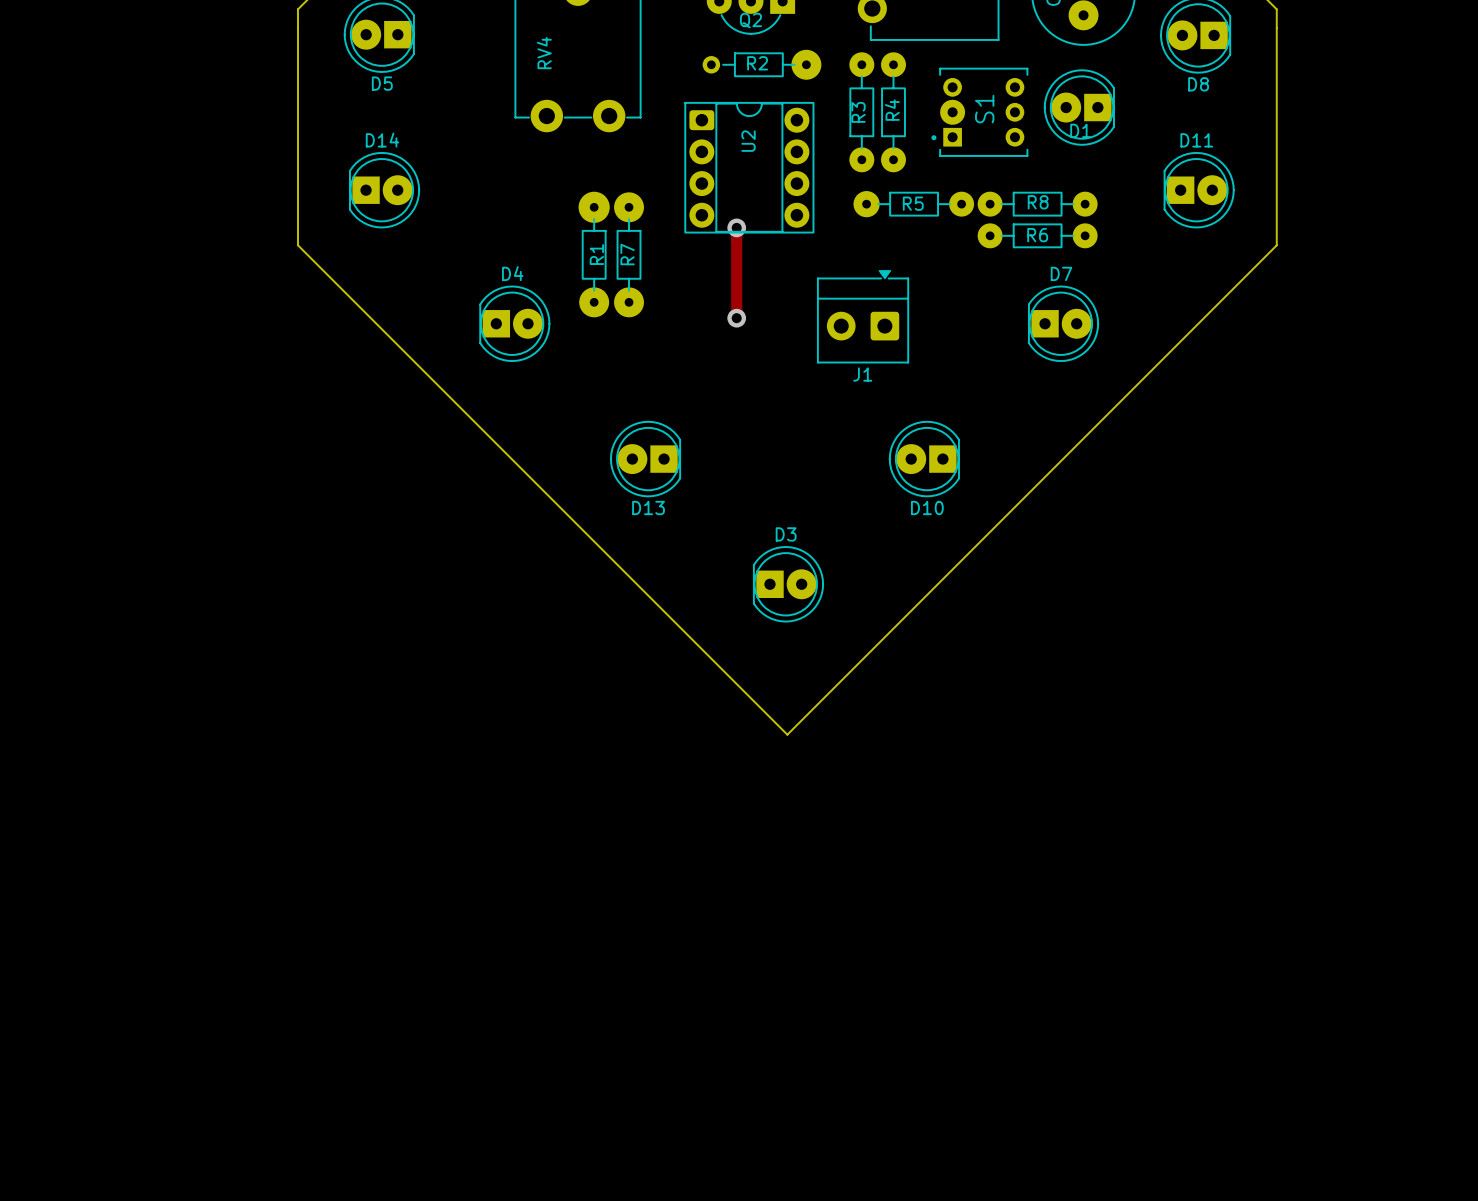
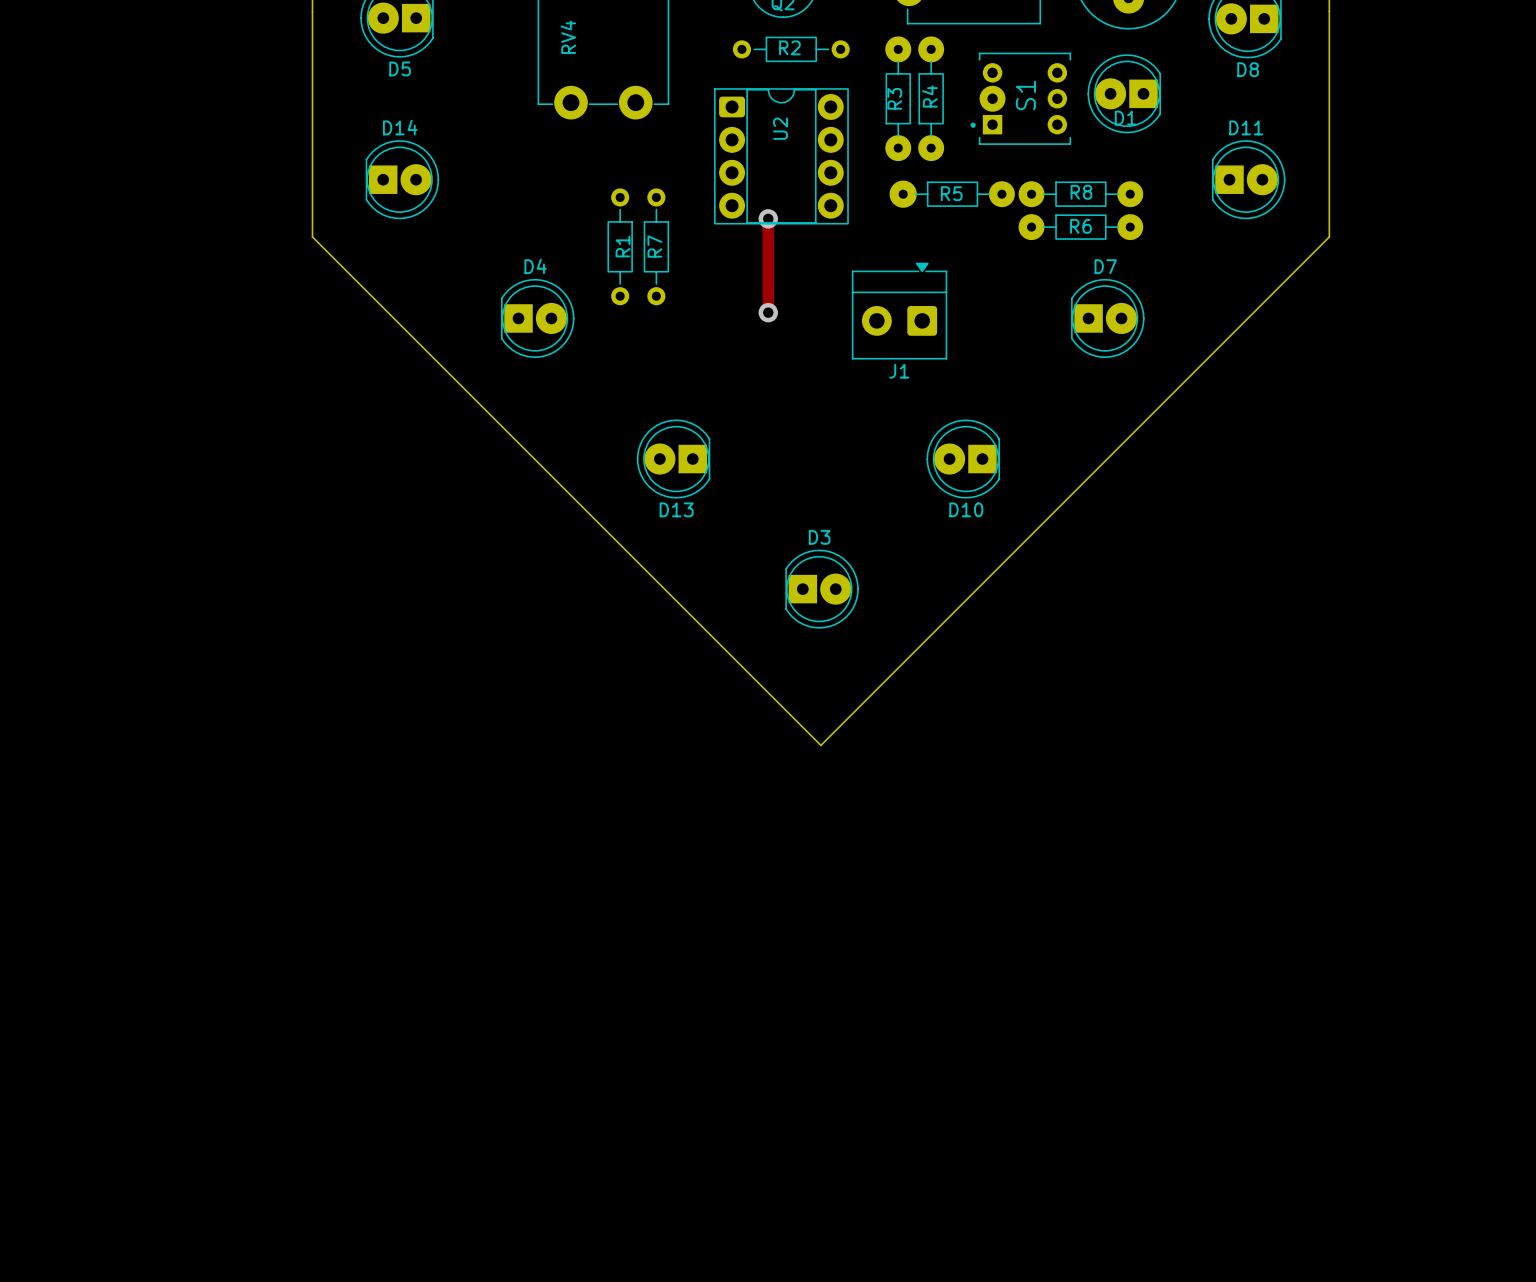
R2 footprint: [702, 49, 822, 80] -> [732, 36, 850, 63]
R1 footprint: [578, 191, 610, 318] -> [607, 188, 633, 306]
R7 footprint: [614, 192, 644, 318] -> [643, 188, 670, 306]

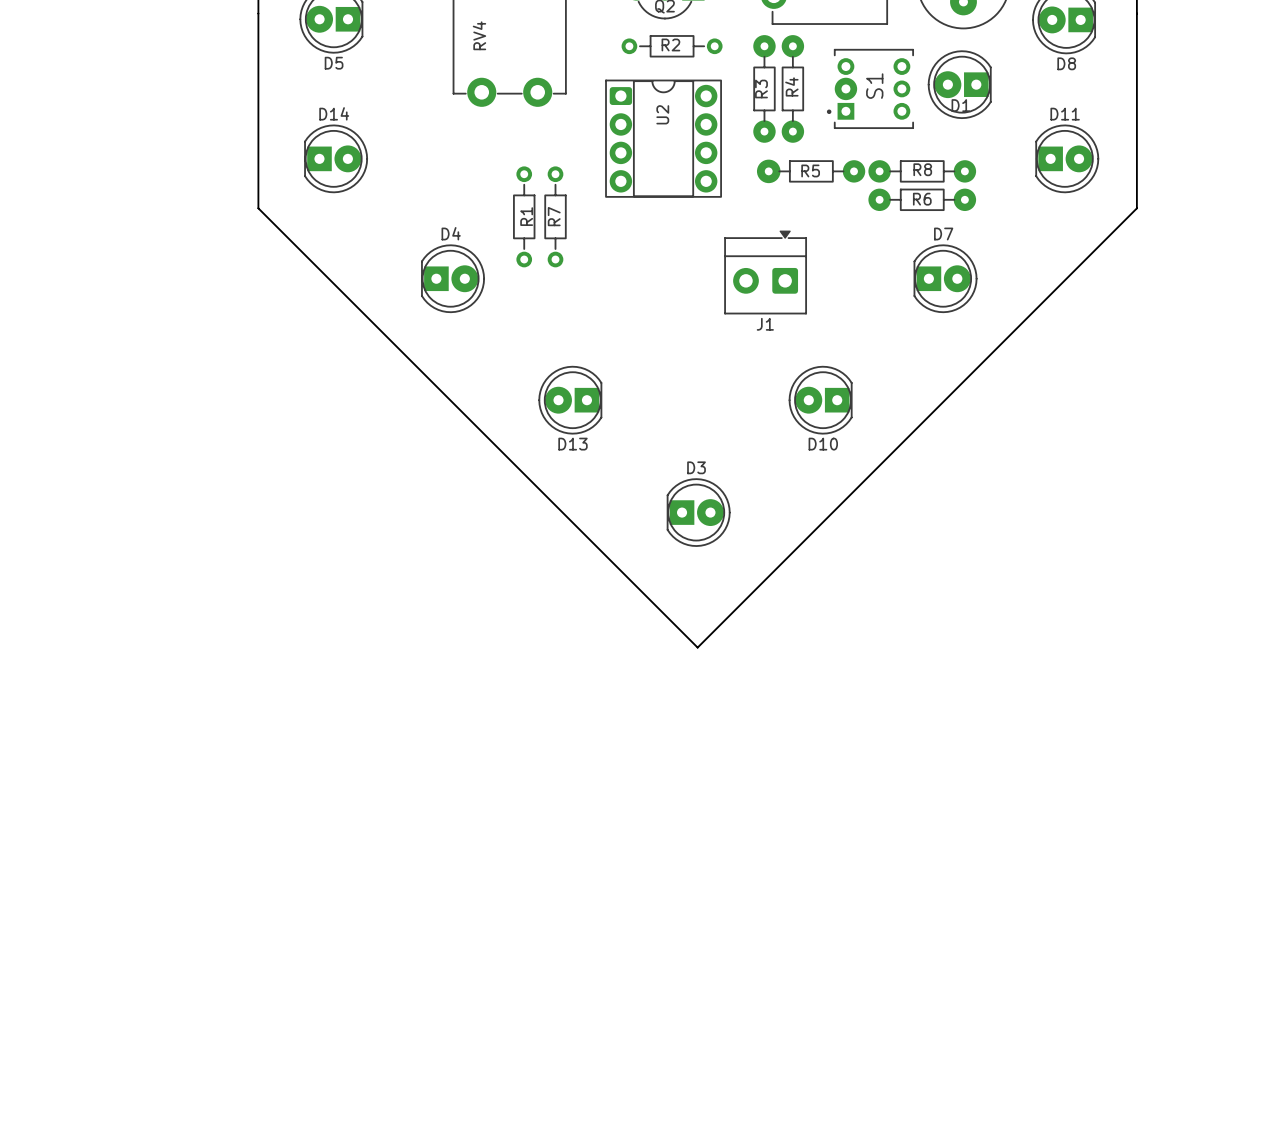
track: (768, 218) (768, 312) -> none
via: (768, 218) -> none
via: (768, 312) -> none

